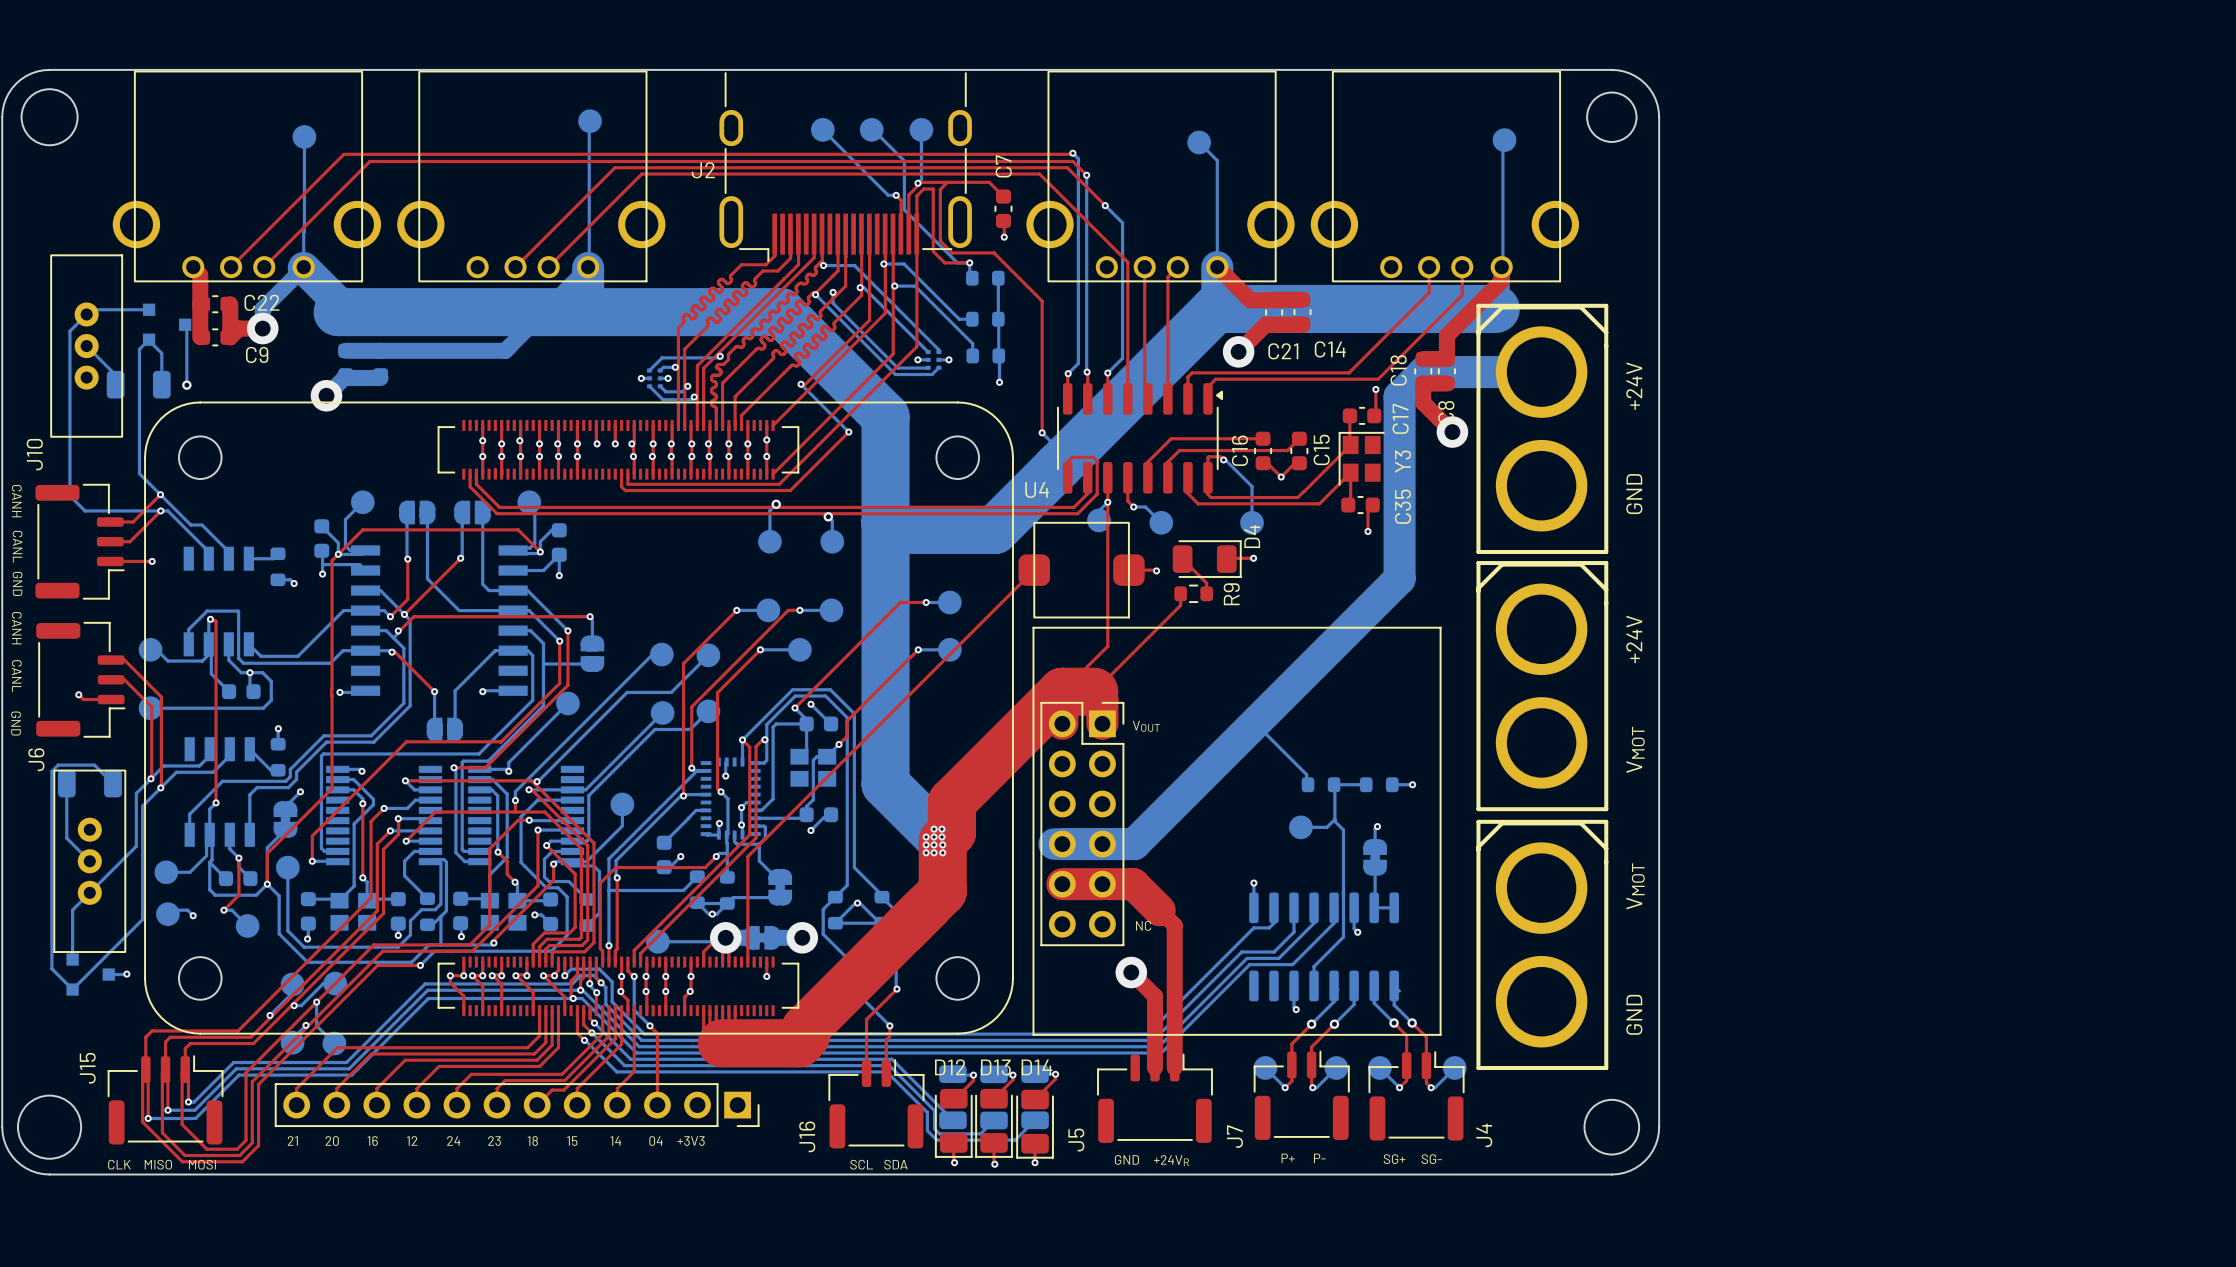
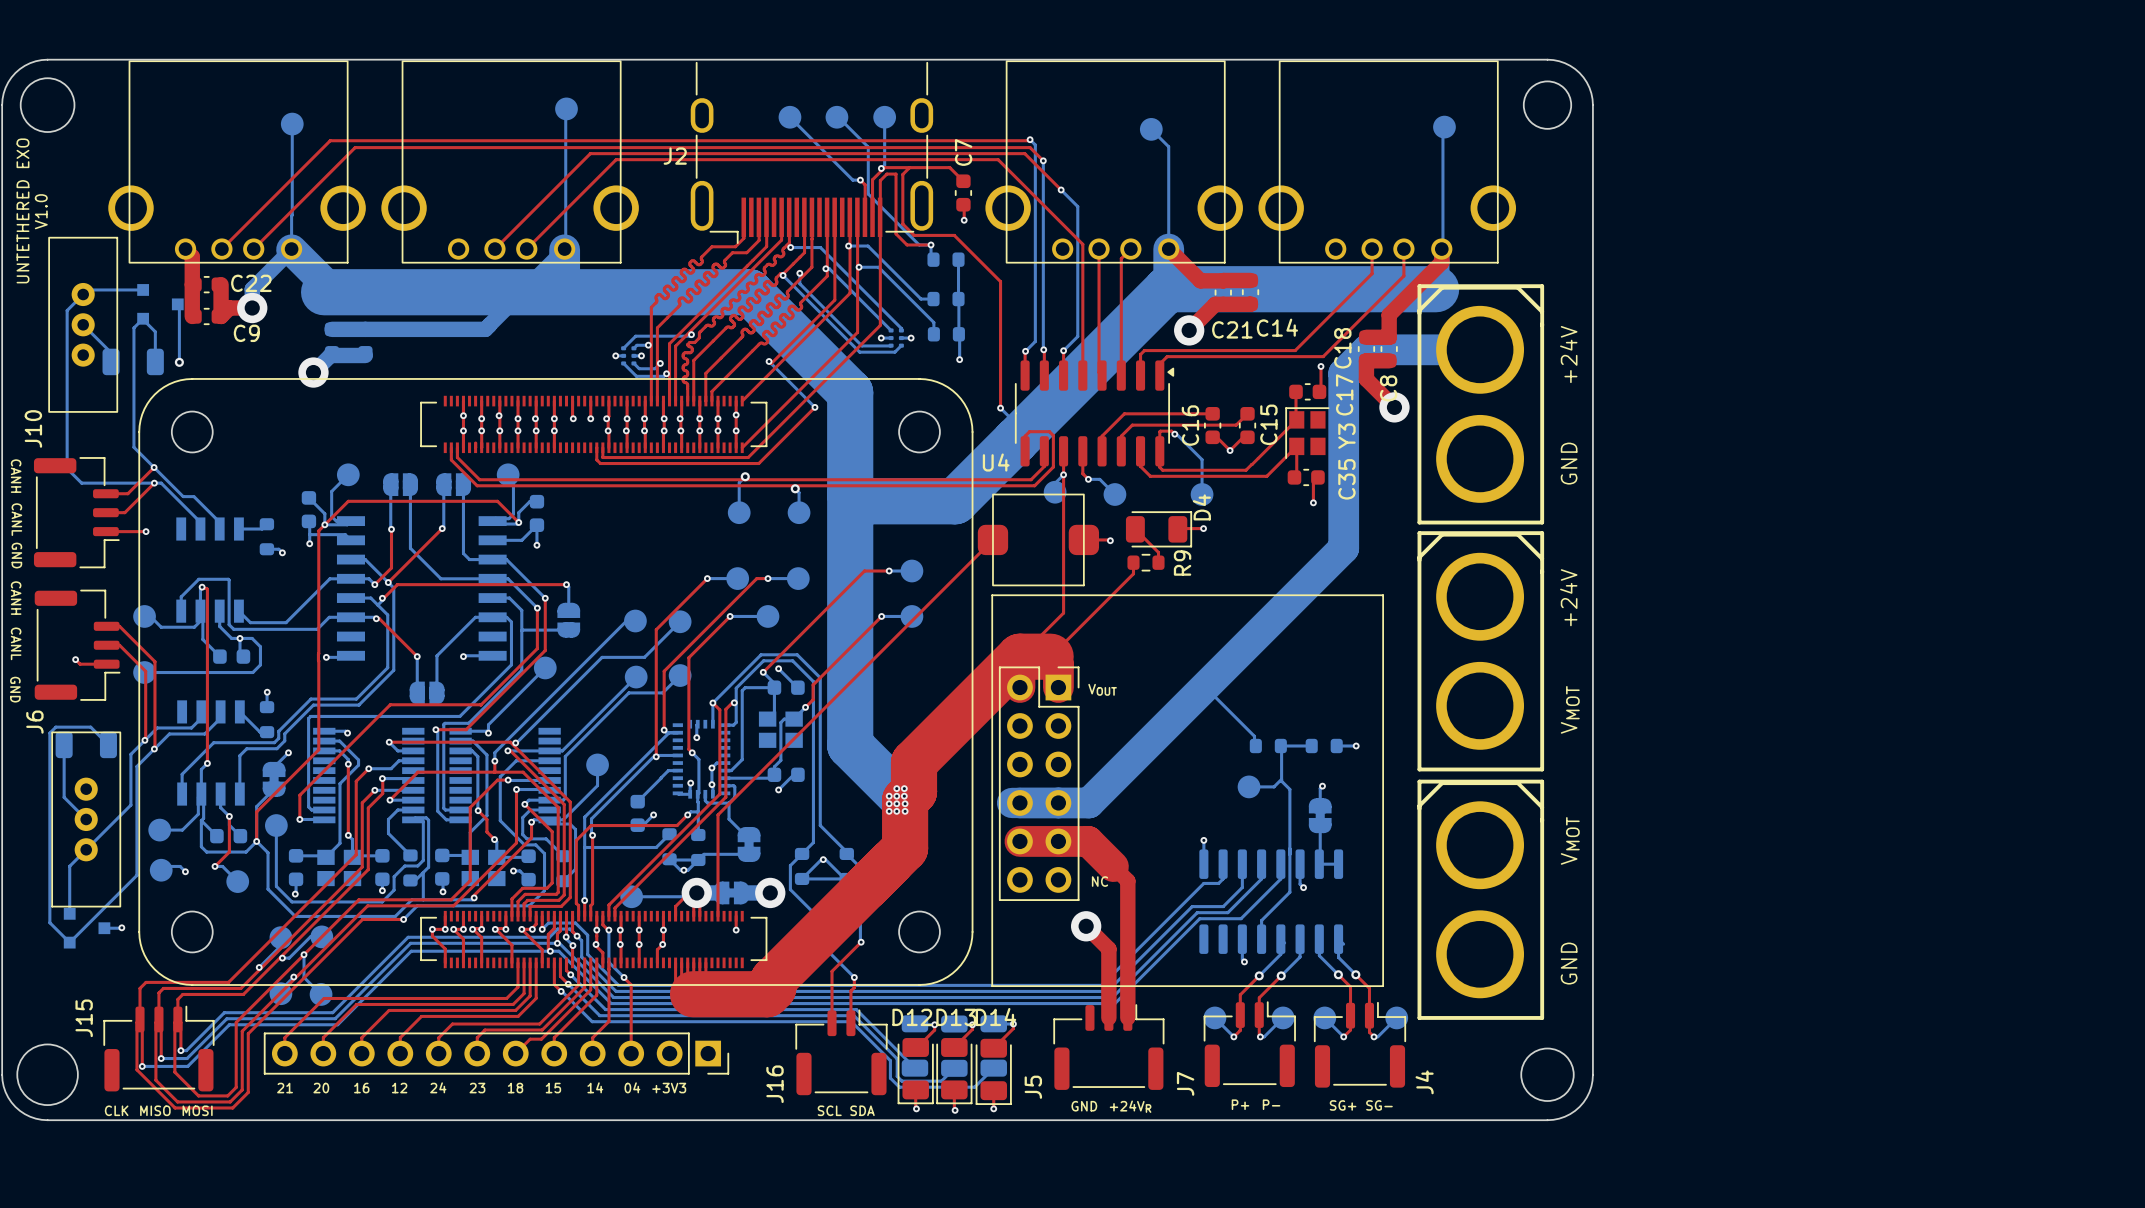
text: none -> UNTETHERED EXO (22, 210)
text: none -> V1.0 (41, 211)

